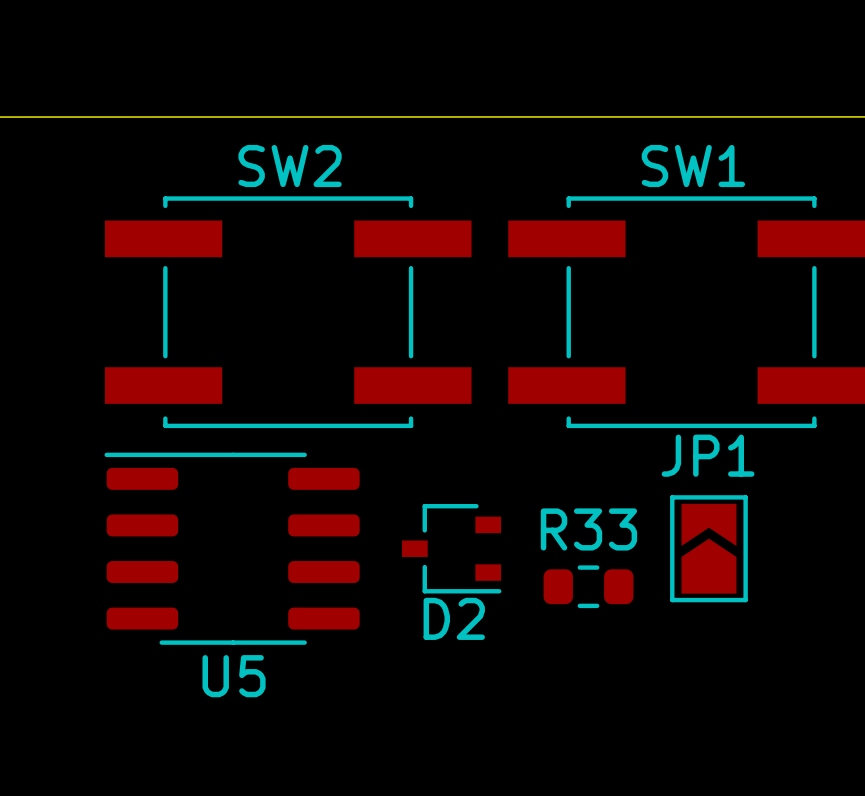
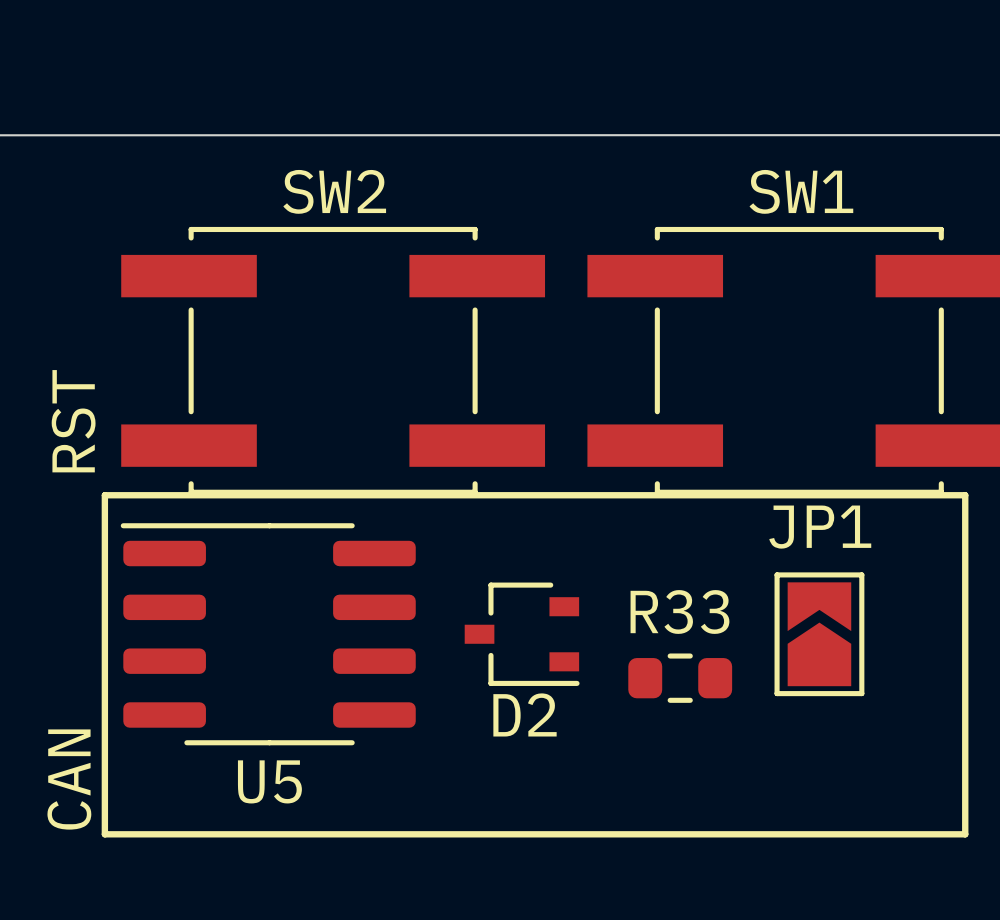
text: none -> RST (73, 421)
line: none -> (104, 495) (104, 834) (965, 834) (965, 495) (104, 495)
text: none -> CAN (69, 779)

